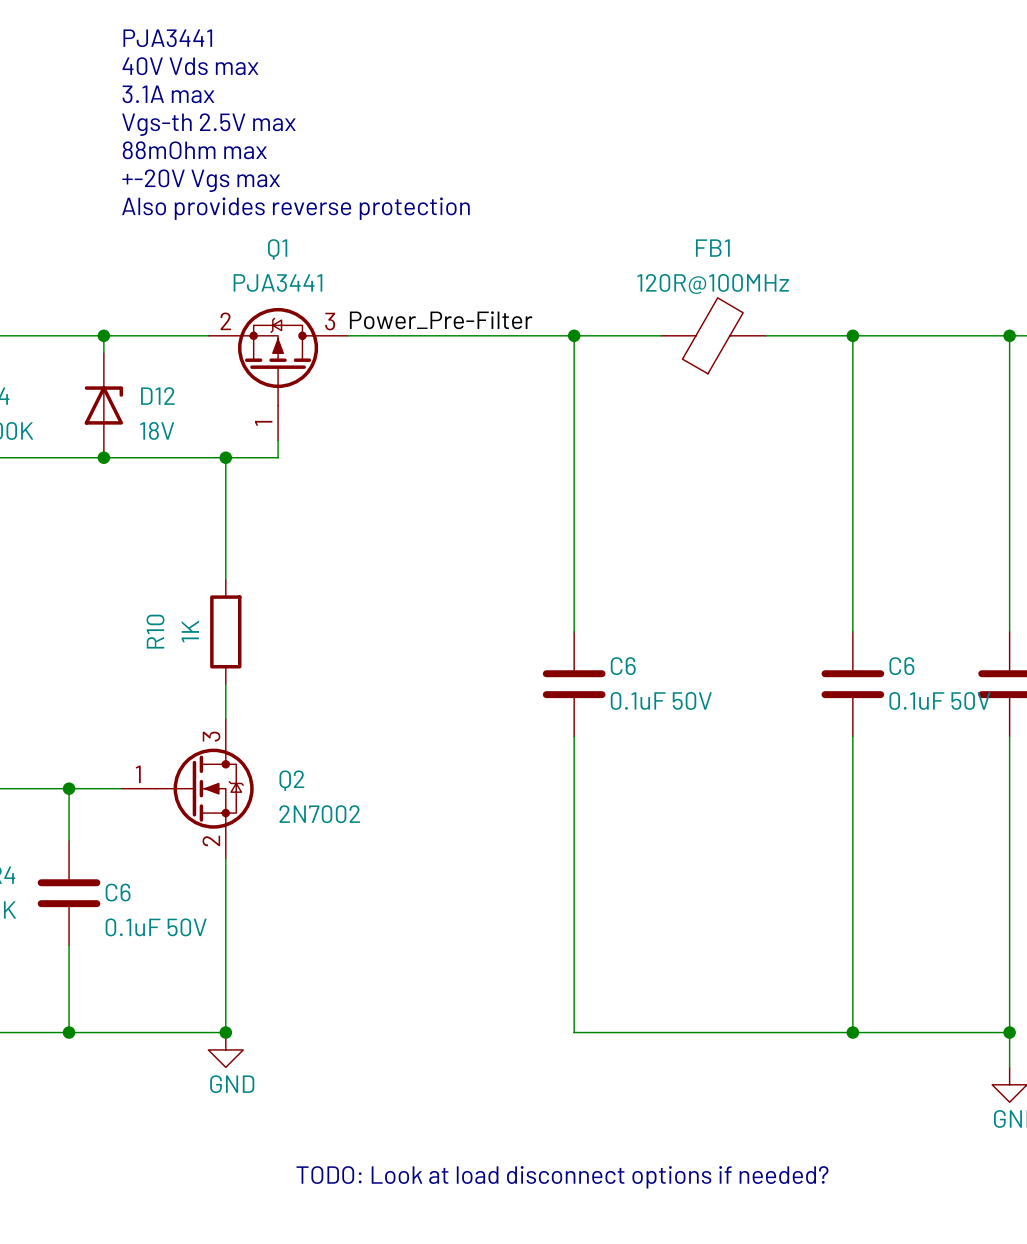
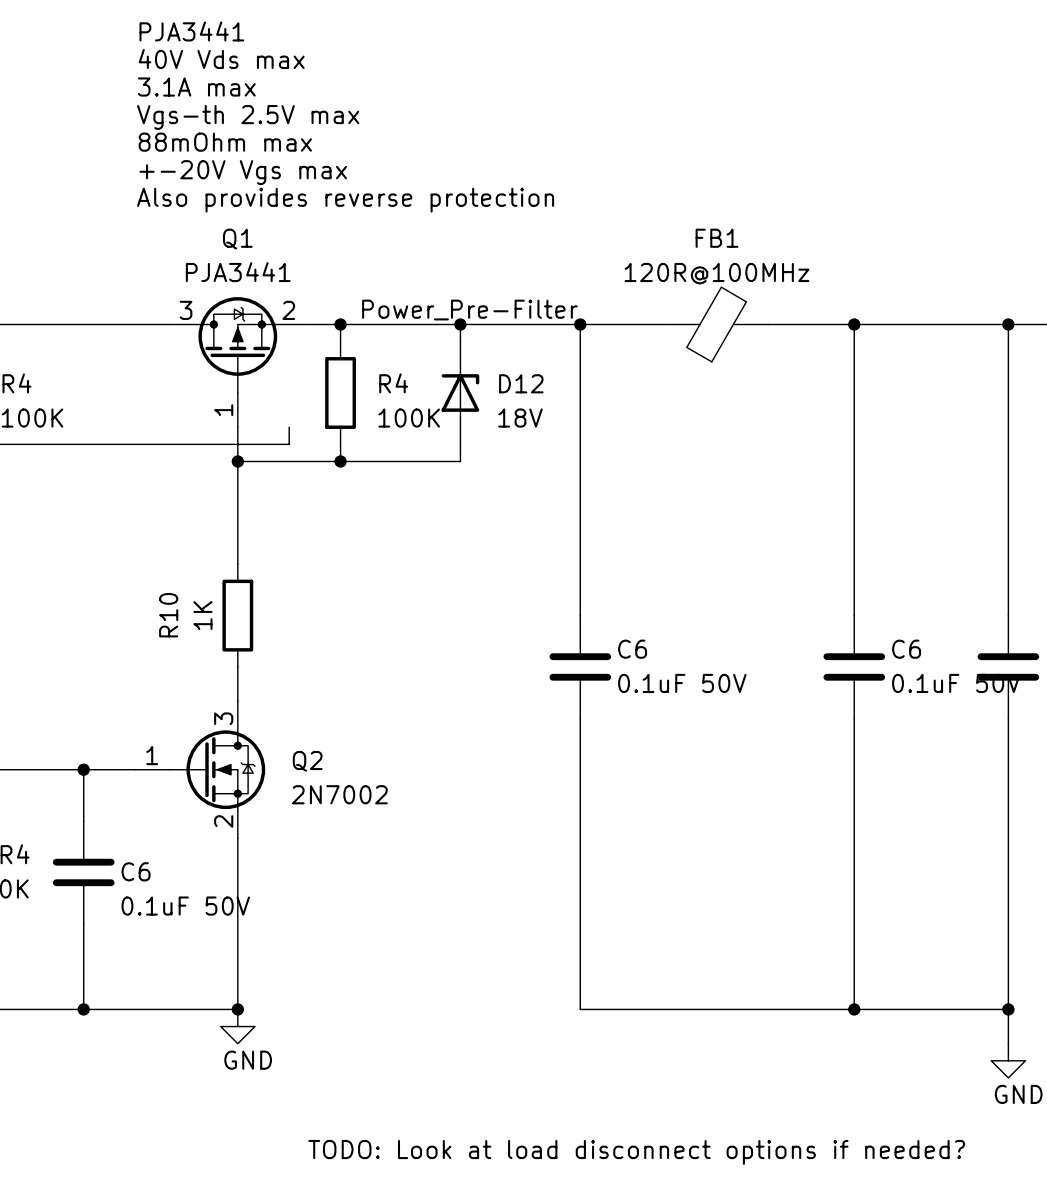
wire: (103, 335) (103, 353) -> (237, 427) (237, 444)
junction: (103, 335) -> none
wire: none -> (340, 324) (340, 341)
junction: none -> (340, 324)
wire: none -> (460, 324) (460, 341)
junction: none -> (460, 324)
Q1 flip: as is (278, 356) -> left-right (237, 345)
D12 position: (103, 405) -> (460, 393)
R4: none -> 100K (340, 393)
junction: (103, 457) -> none
junction position: (225, 457) -> (237, 461)
wire: none -> (340, 444) (340, 461)
wire: none -> (460, 444) (460, 461) (237, 461)
junction: none -> (340, 461)

